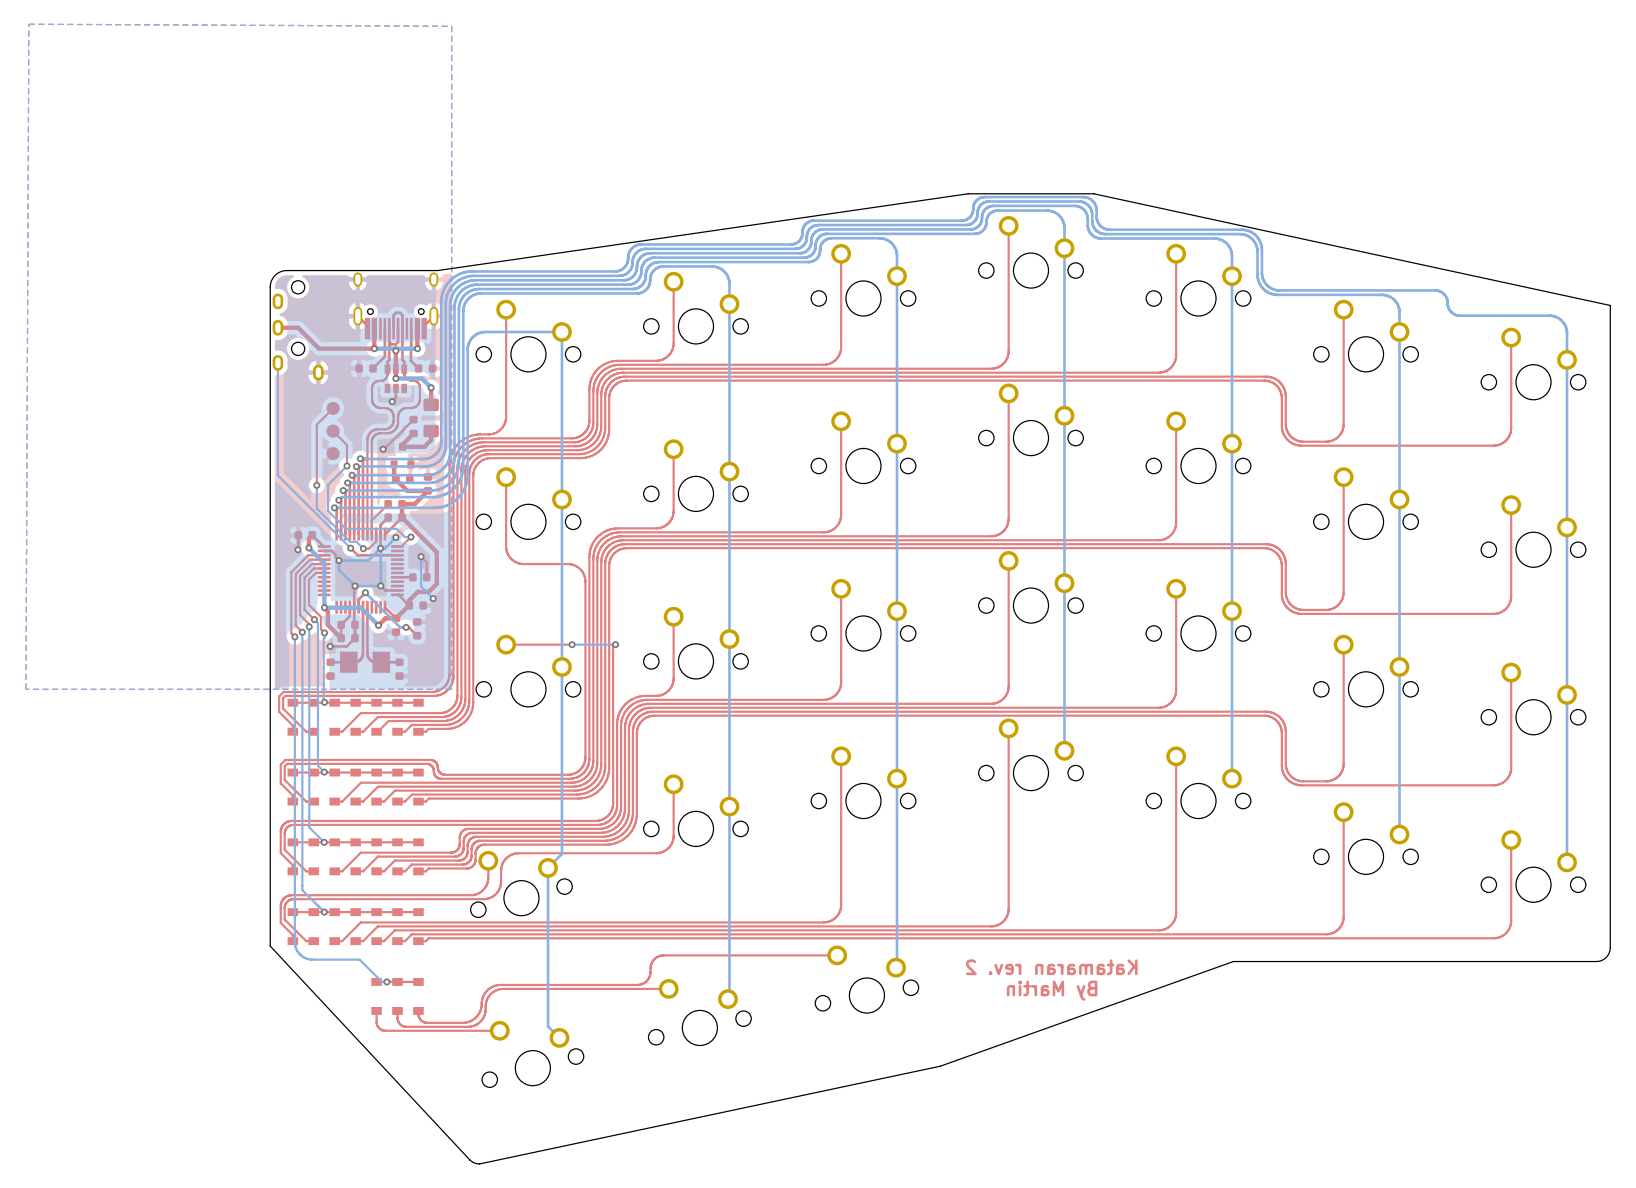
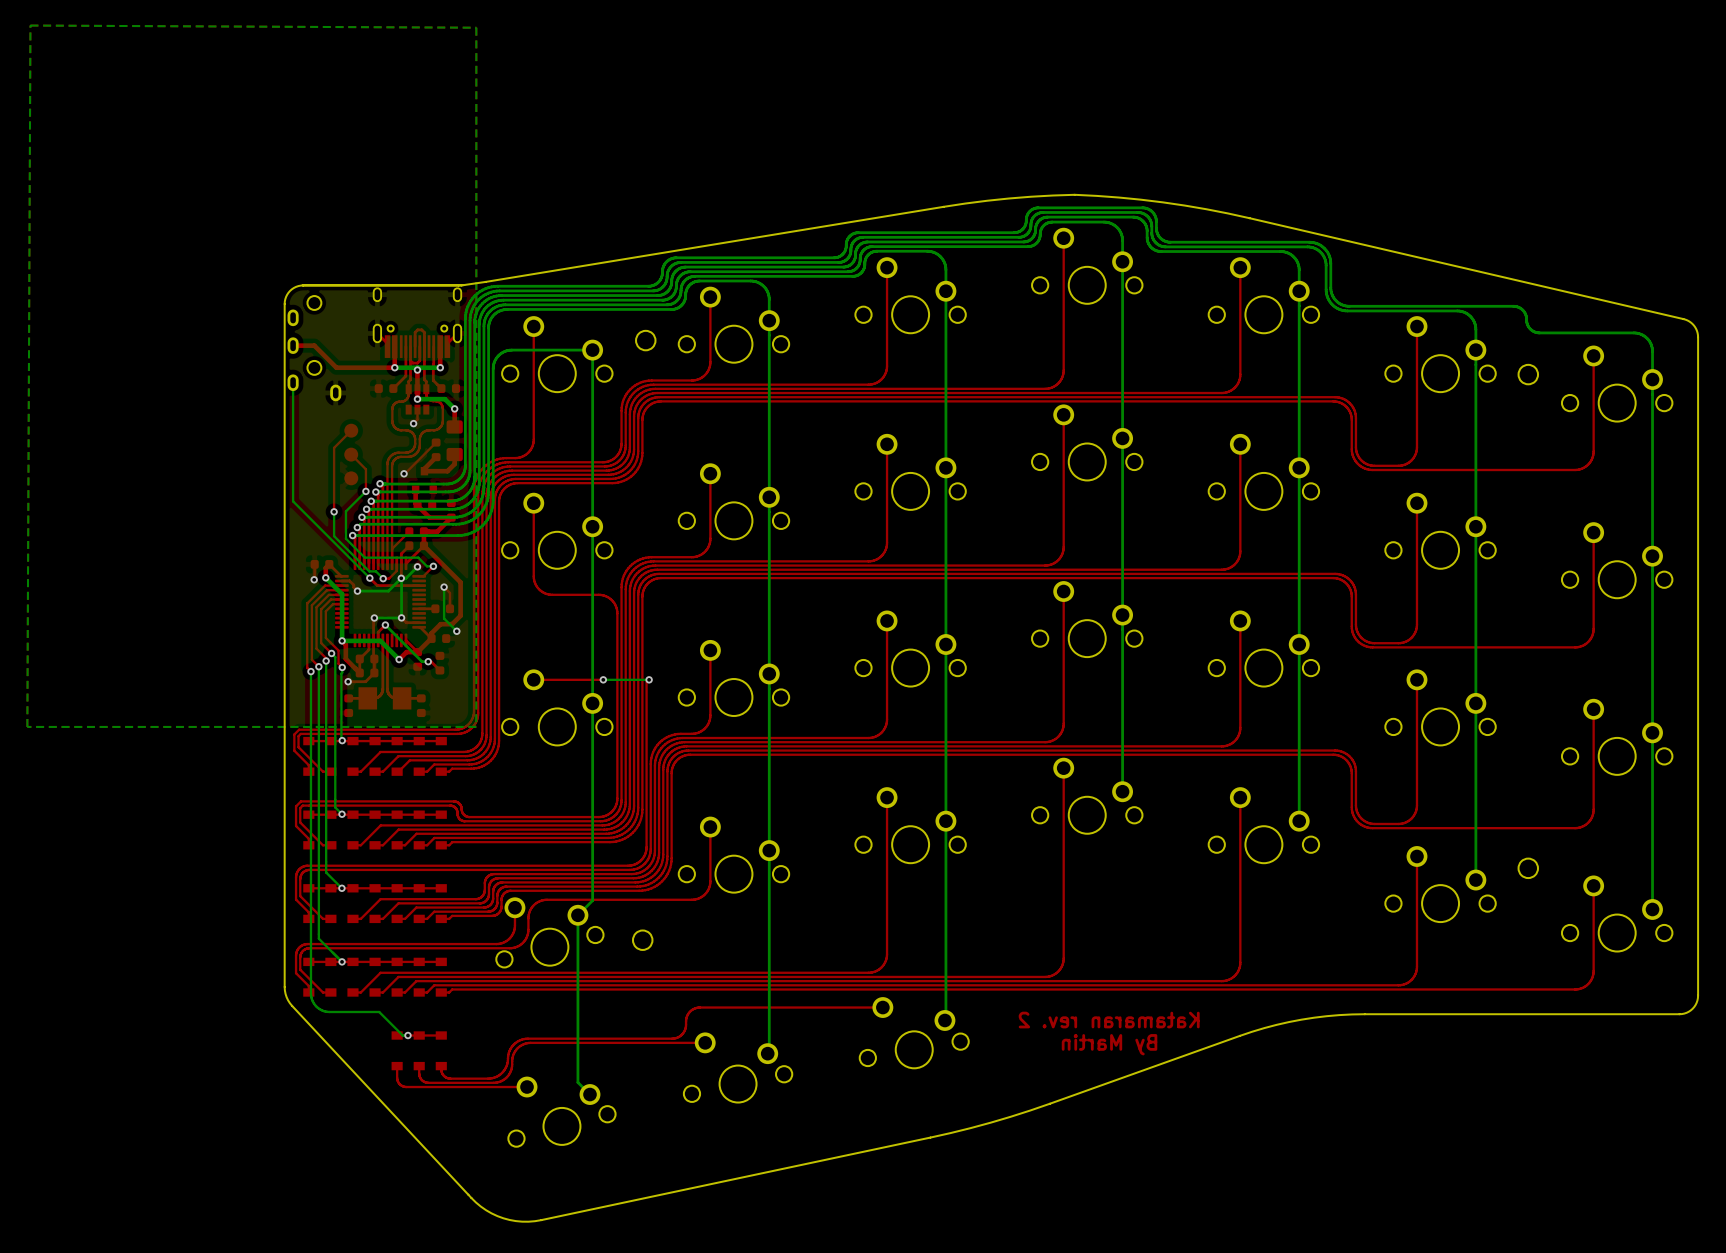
board edge: (460, 267) (968, 193) (1093, 193) (1610, 305) (1610, 947) (1608, 954) (1603, 959) (1596, 961) (1233, 961) (940, 1066) (479, 1163) (472, 1162) (270, 946) (270, 287) (275, 275) (286, 270) -> (485, 281) (965, 203) (1008, 198) (1074, 194) (1140, 199) (1228, 213) (1689, 321) (1695, 327) (1698, 337) (1698, 995) (1695, 1004) (1688, 1011) (1679, 1014) (1364, 1014) (1301, 1019) (1252, 1031) (1030, 1110) (950, 1133) (534, 1221) (509, 1219) (486, 1210) (471, 1198) (292, 1005) (286, 997) (284, 986) (285, 299) (290, 290) (300, 285) (464, 285)
round board edge: none -> [635, 330, 656, 351]
round board edge: none -> [1518, 364, 1539, 385]
bottom track: (339, 560) (339, 570) (355, 586) -> none
round board edge: none -> [1518, 858, 1539, 879]
round board edge: none -> [632, 930, 653, 951]

